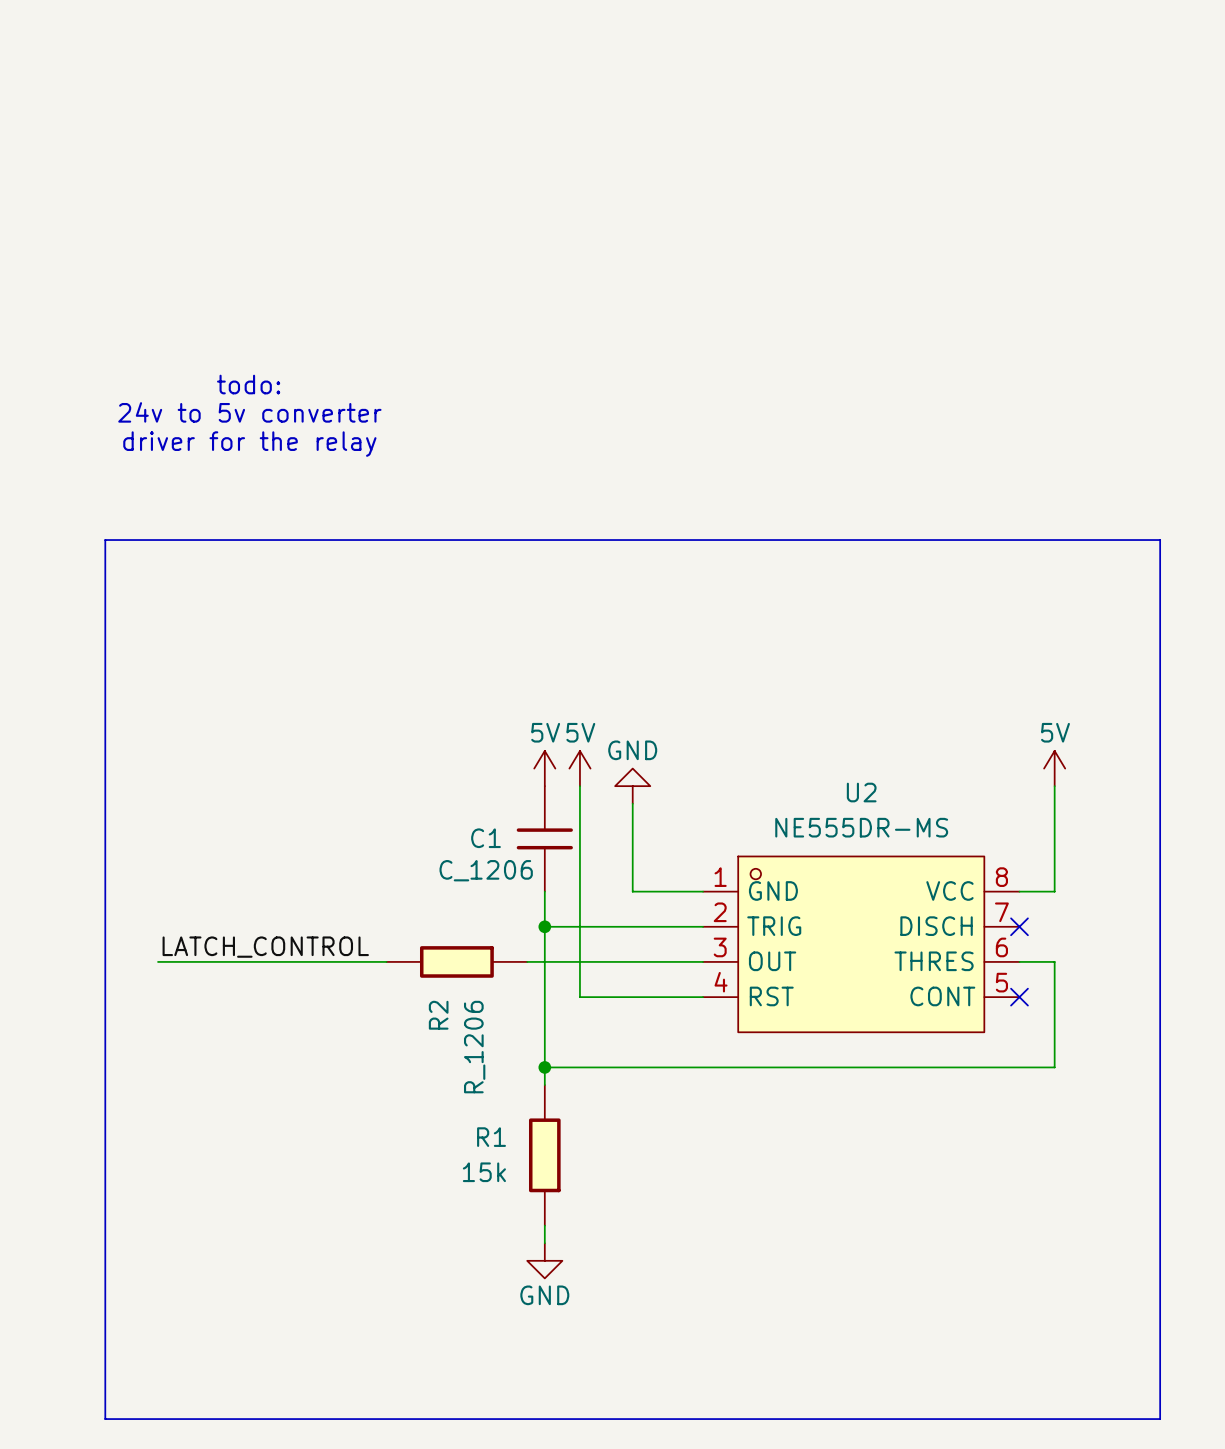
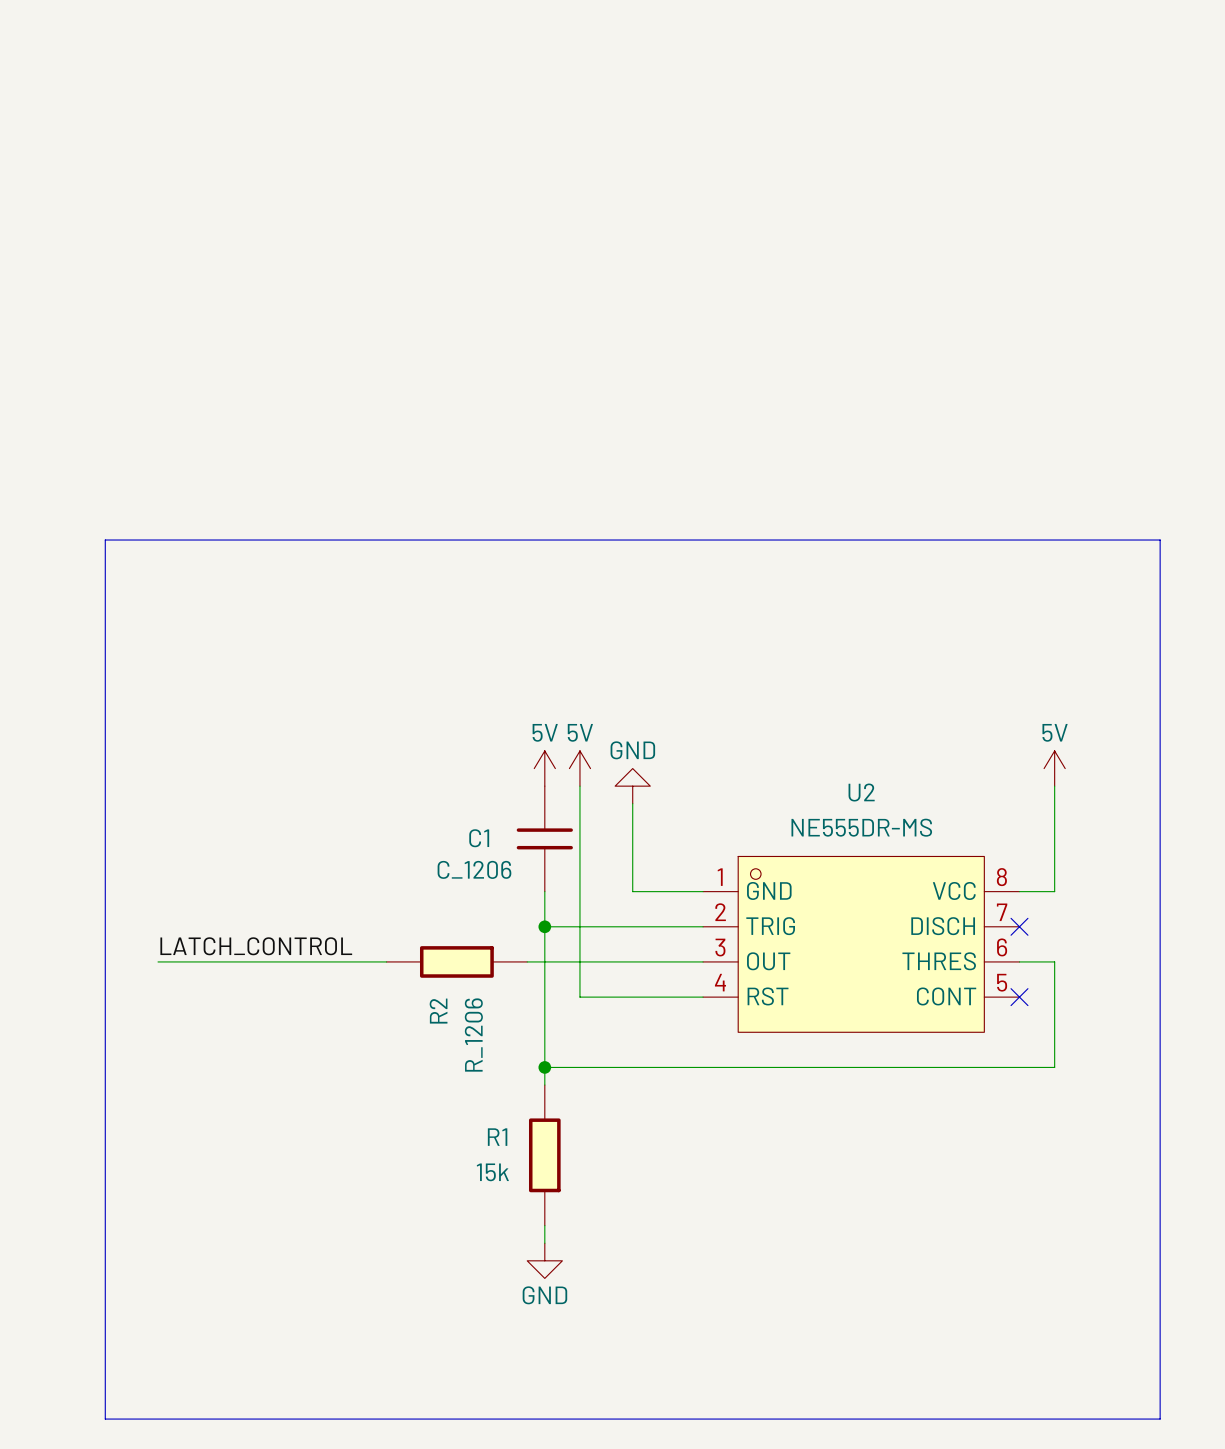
text: todo: (248, 384) -> none
text: 24v to 5v converter (249, 412) -> none
text: driver for the relay (249, 444) -> none

